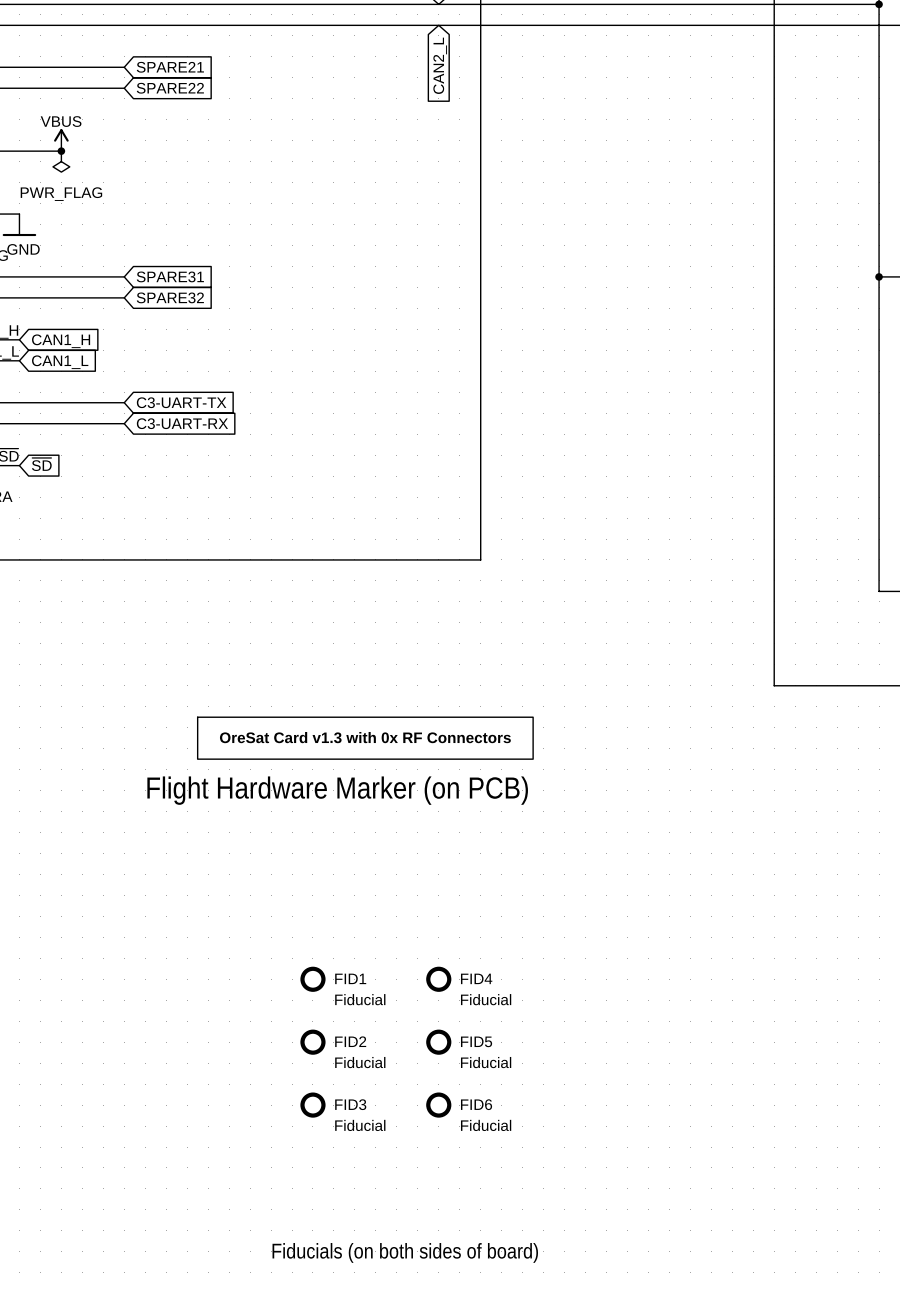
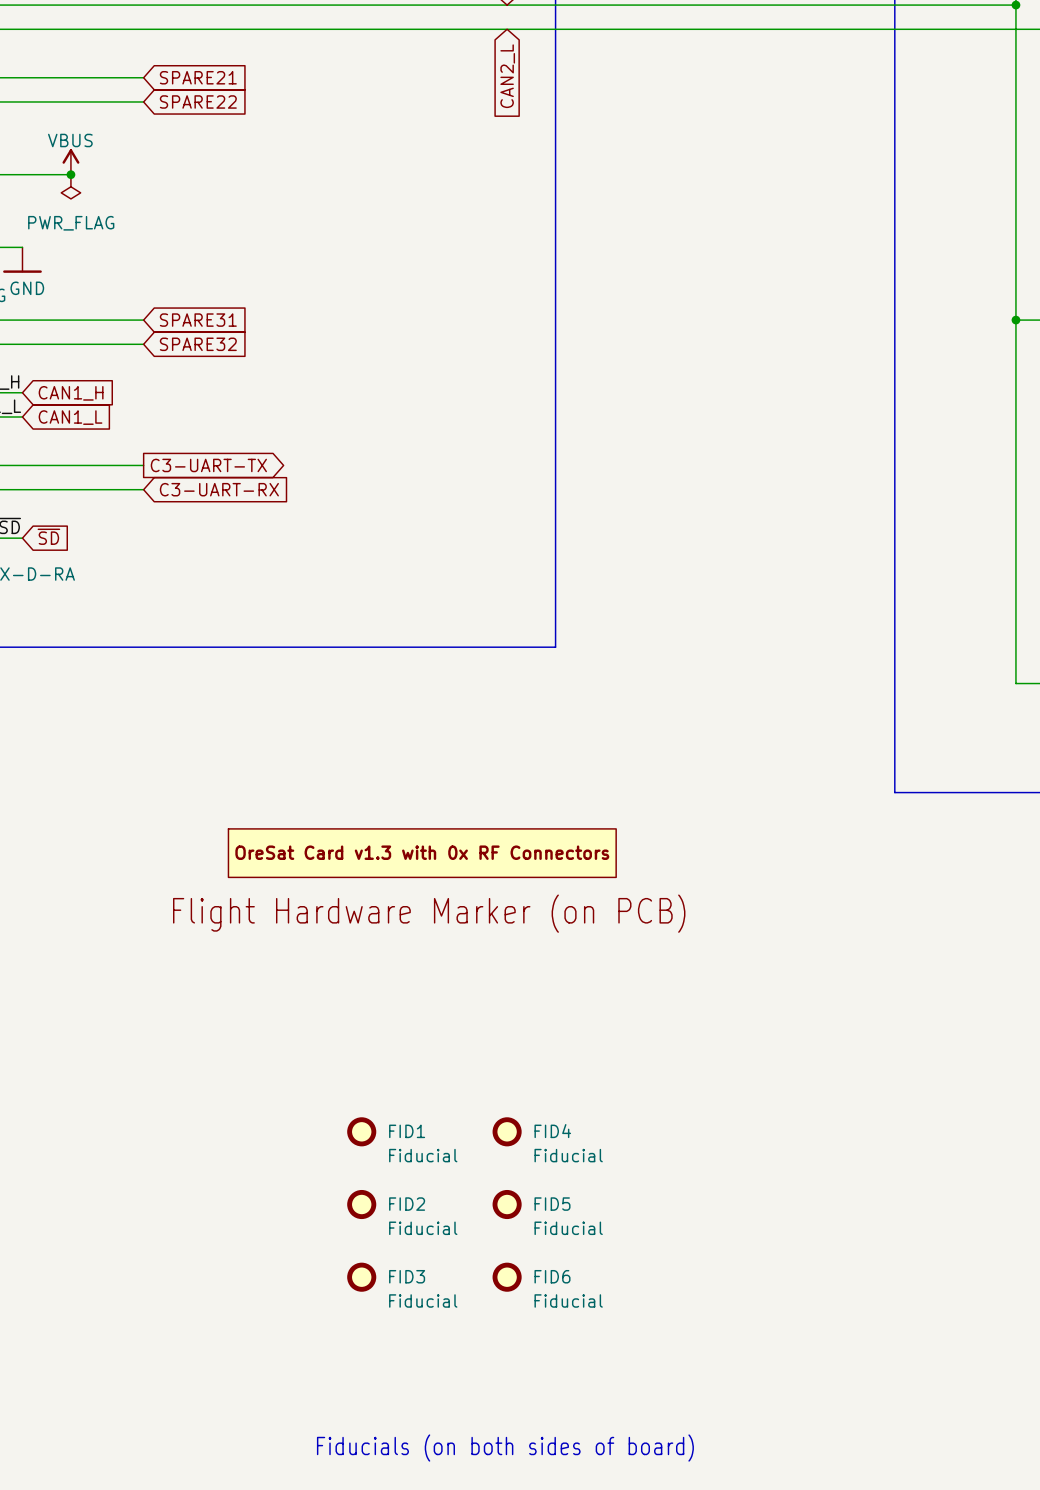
global label shape: input (181, 402) -> output (208, 465)

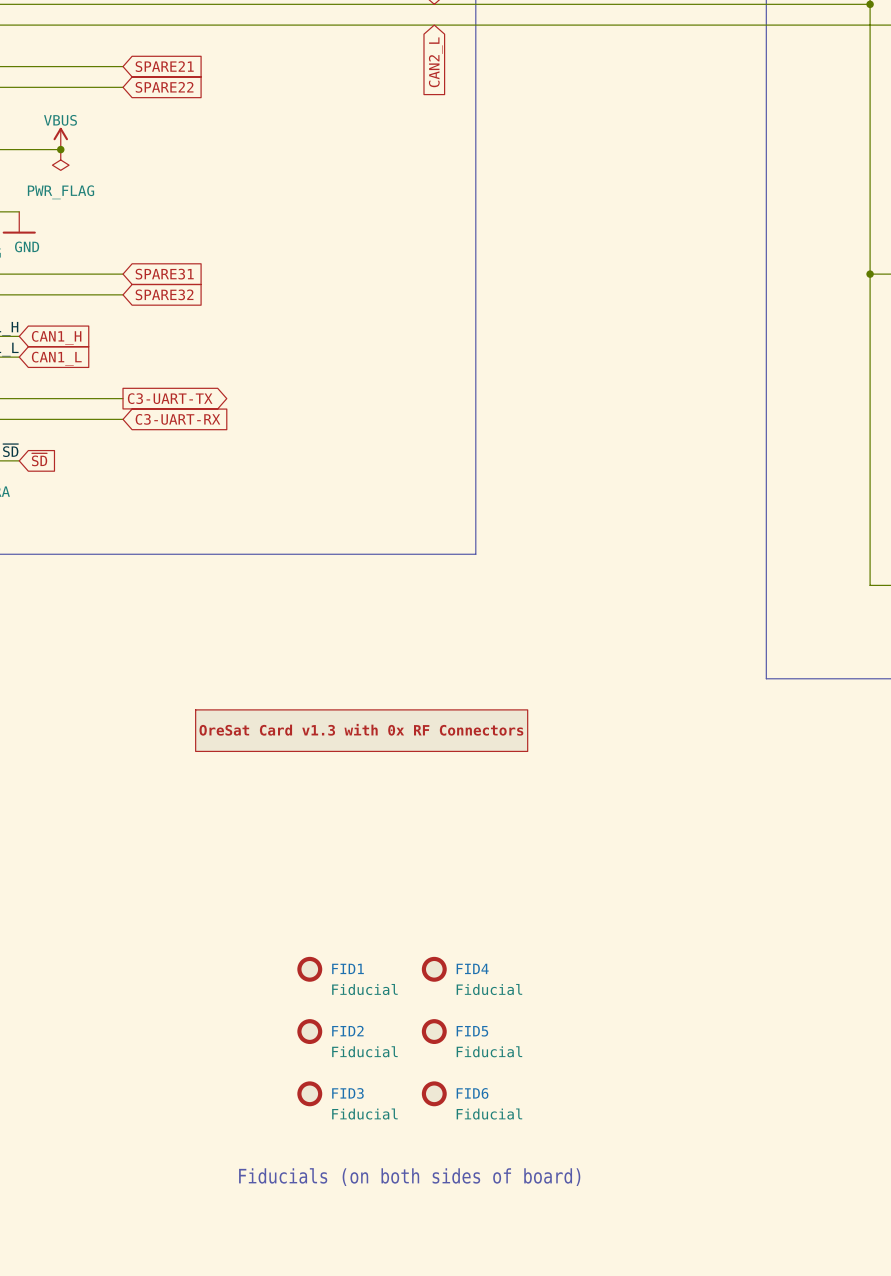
part: (429, 913) -> none
text position: Fiducials (on both sides of board) (505, 1448) -> Fiducials (on both sides of board) (409, 1177)

